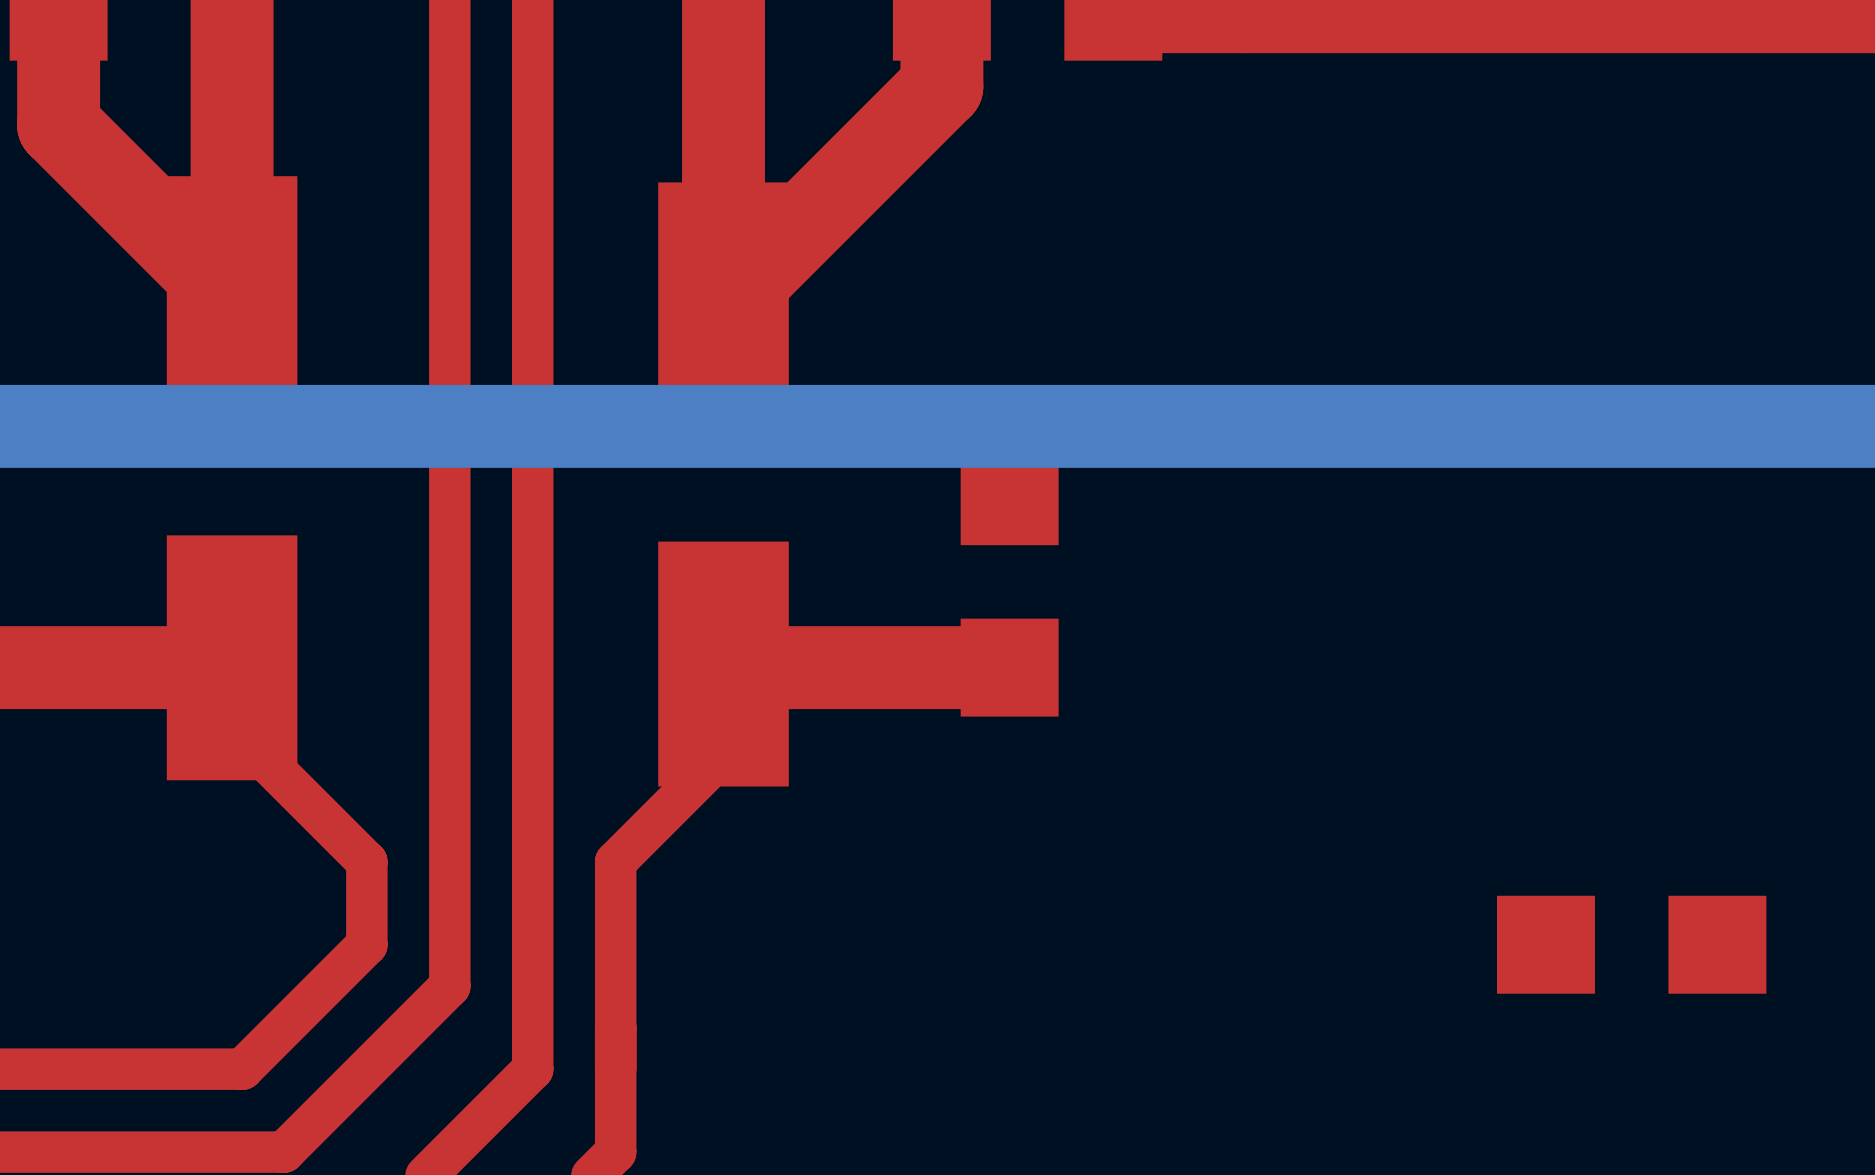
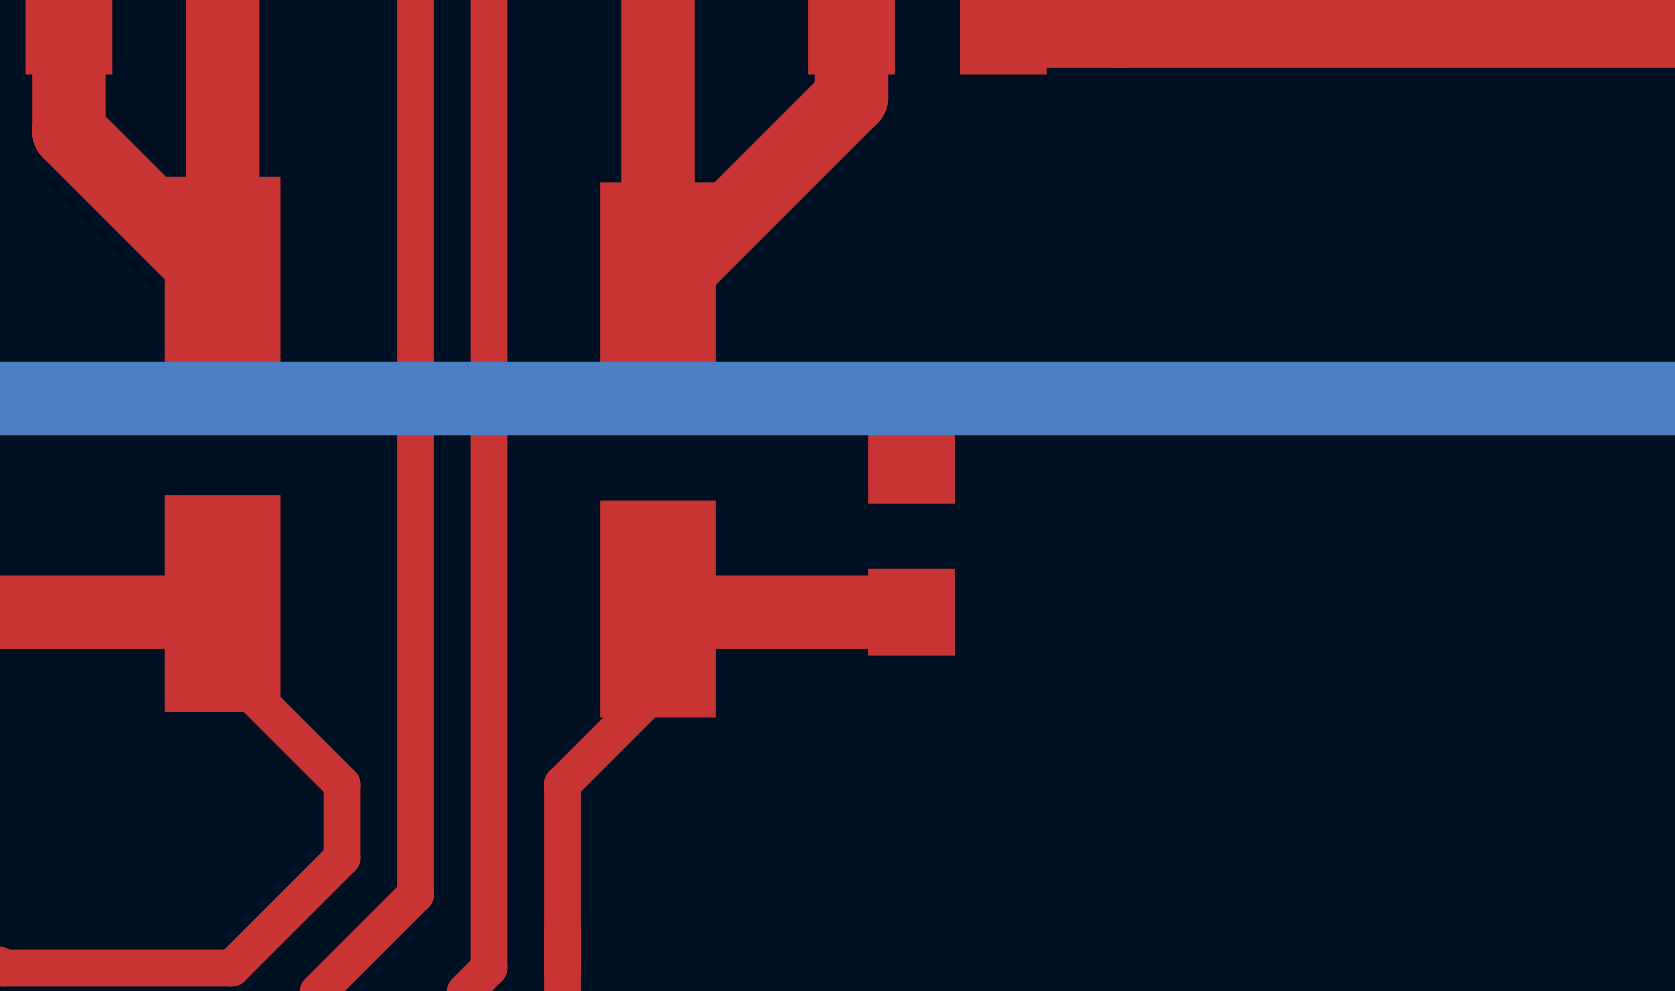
part: (1631, 944) -> none

